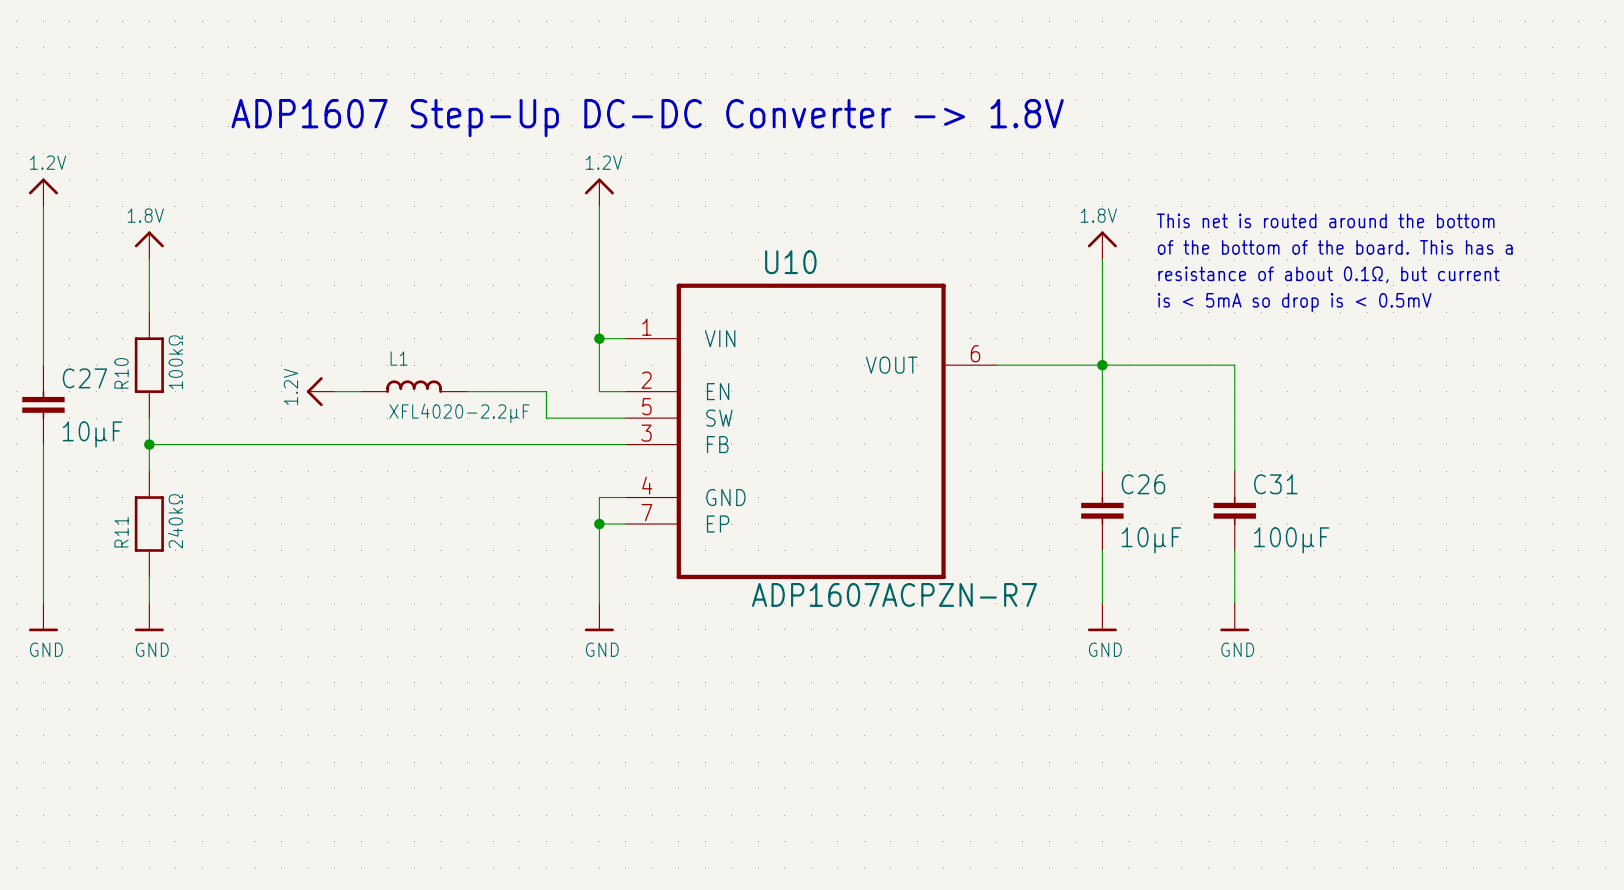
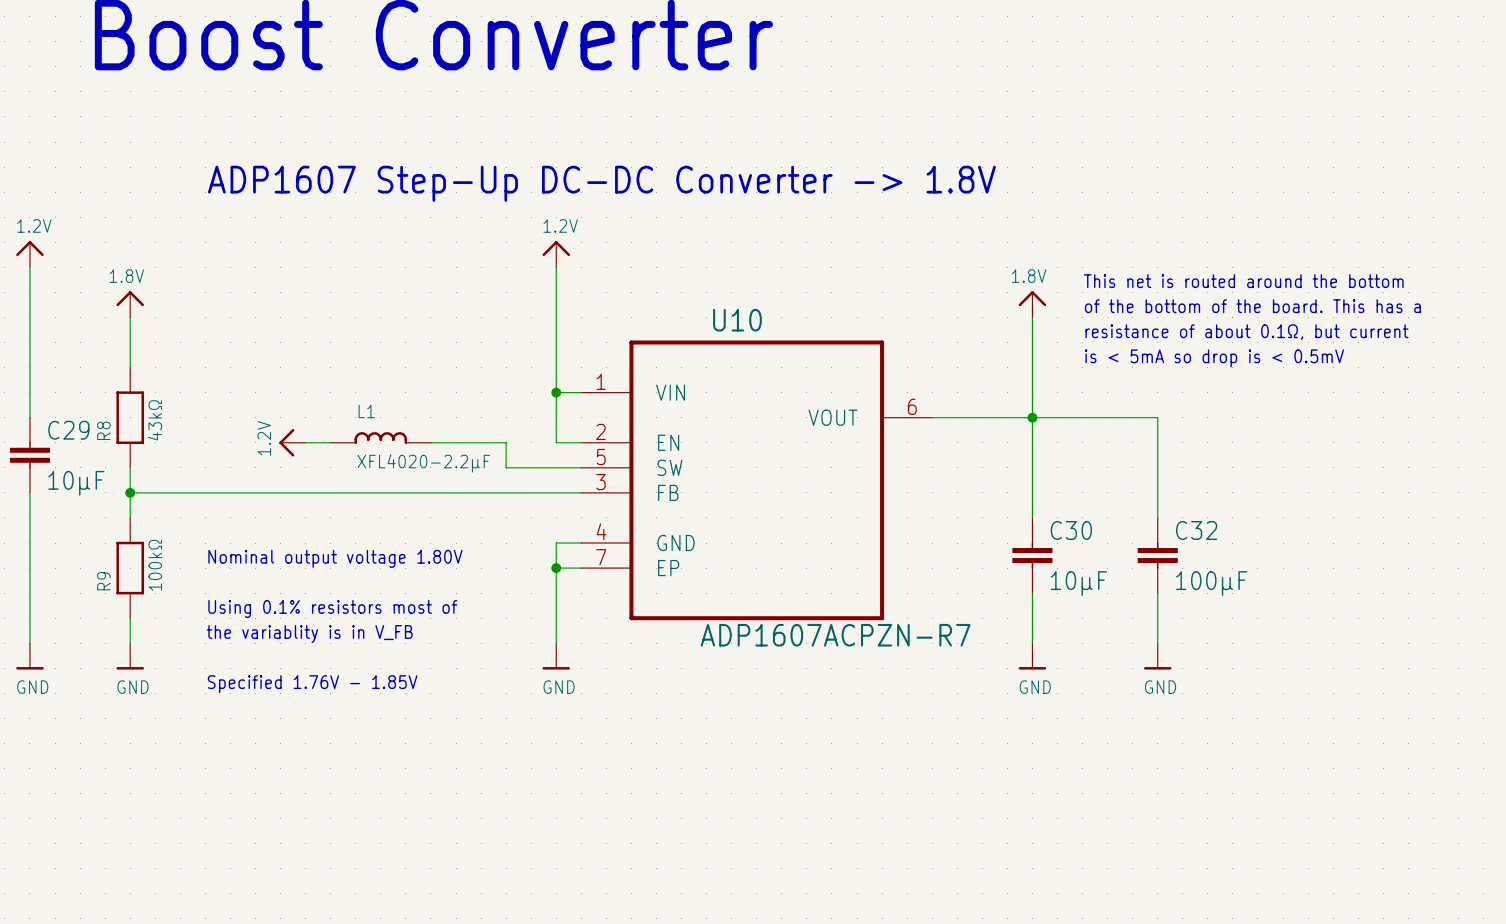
R10 value: 100kΩ (175, 362) -> 43kΩ (154, 420)
R10 name: R10 (121, 373) -> R8 (103, 430)
C27 name: C27 (84, 378) -> C29 (68, 430)
C26 name: C26 (1143, 484) -> C30 (1071, 530)
C31 name: C31 (1275, 484) -> C32 (1196, 530)
text: none -> Nominal output voltage 1.80V (335, 558)
R11 value: 240kΩ (175, 521) -> 100kΩ (155, 565)
R11 name: R11 (121, 532) -> R9 (103, 581)
text: none -> Using 0.1% resistors most of (332, 609)
text: none -> the variablity is in V_FB (309, 634)
text: none -> Specified 1.76V - 1.85V (312, 684)

